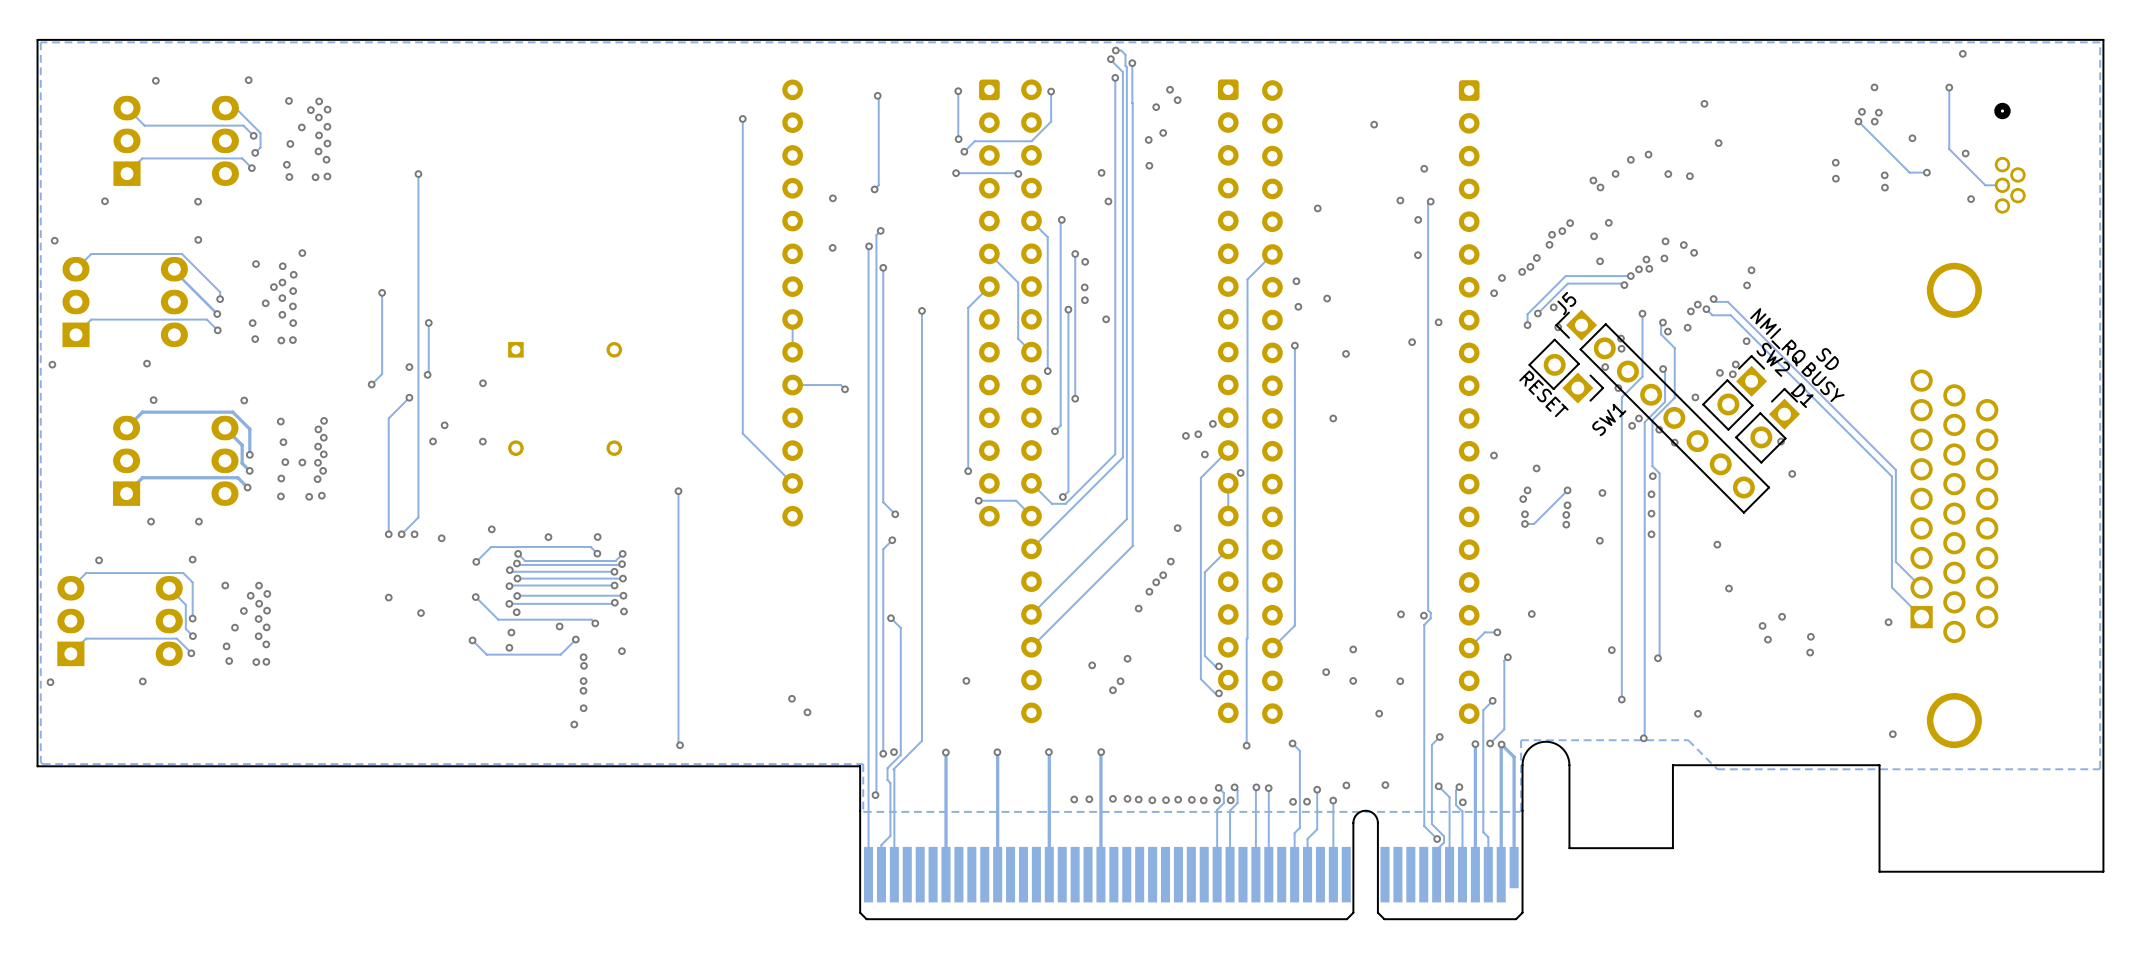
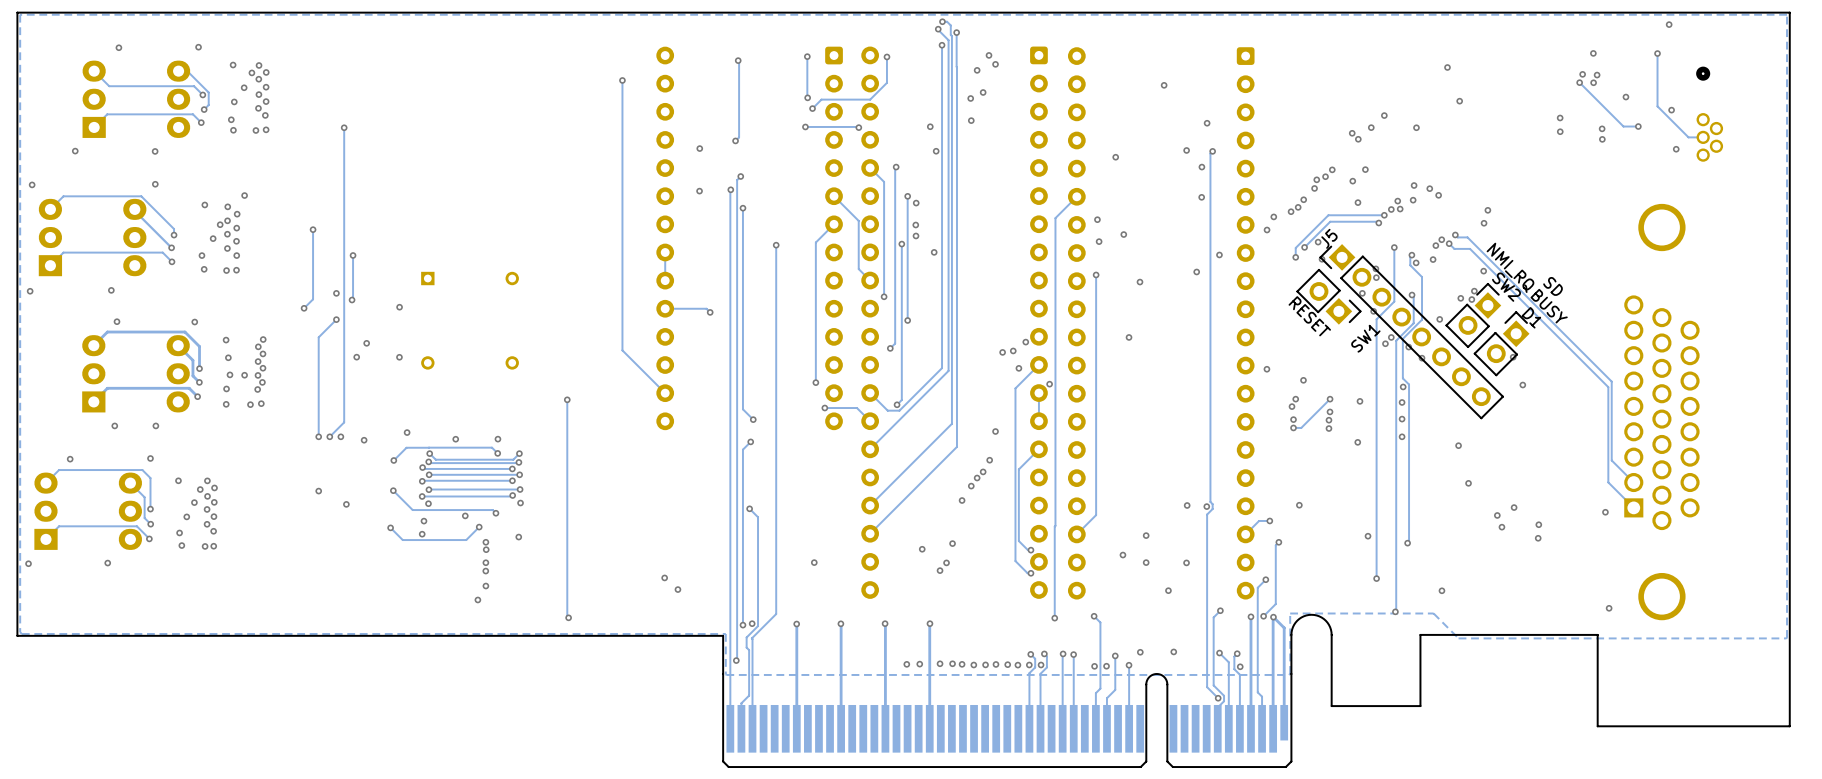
via: (1648, 154) -> none
via: (1689, 176) -> none

